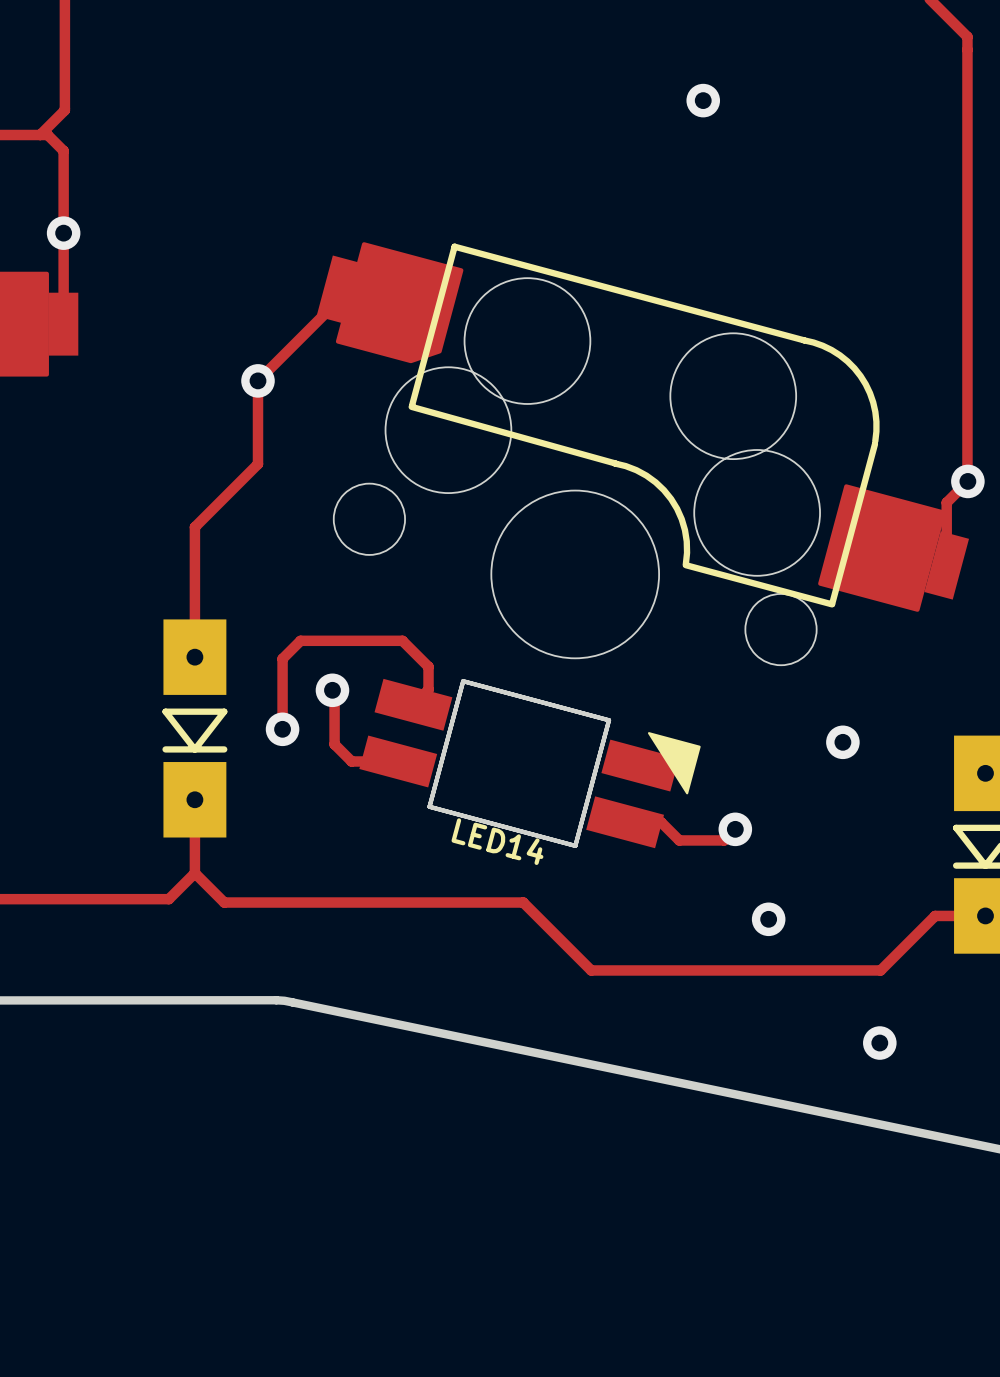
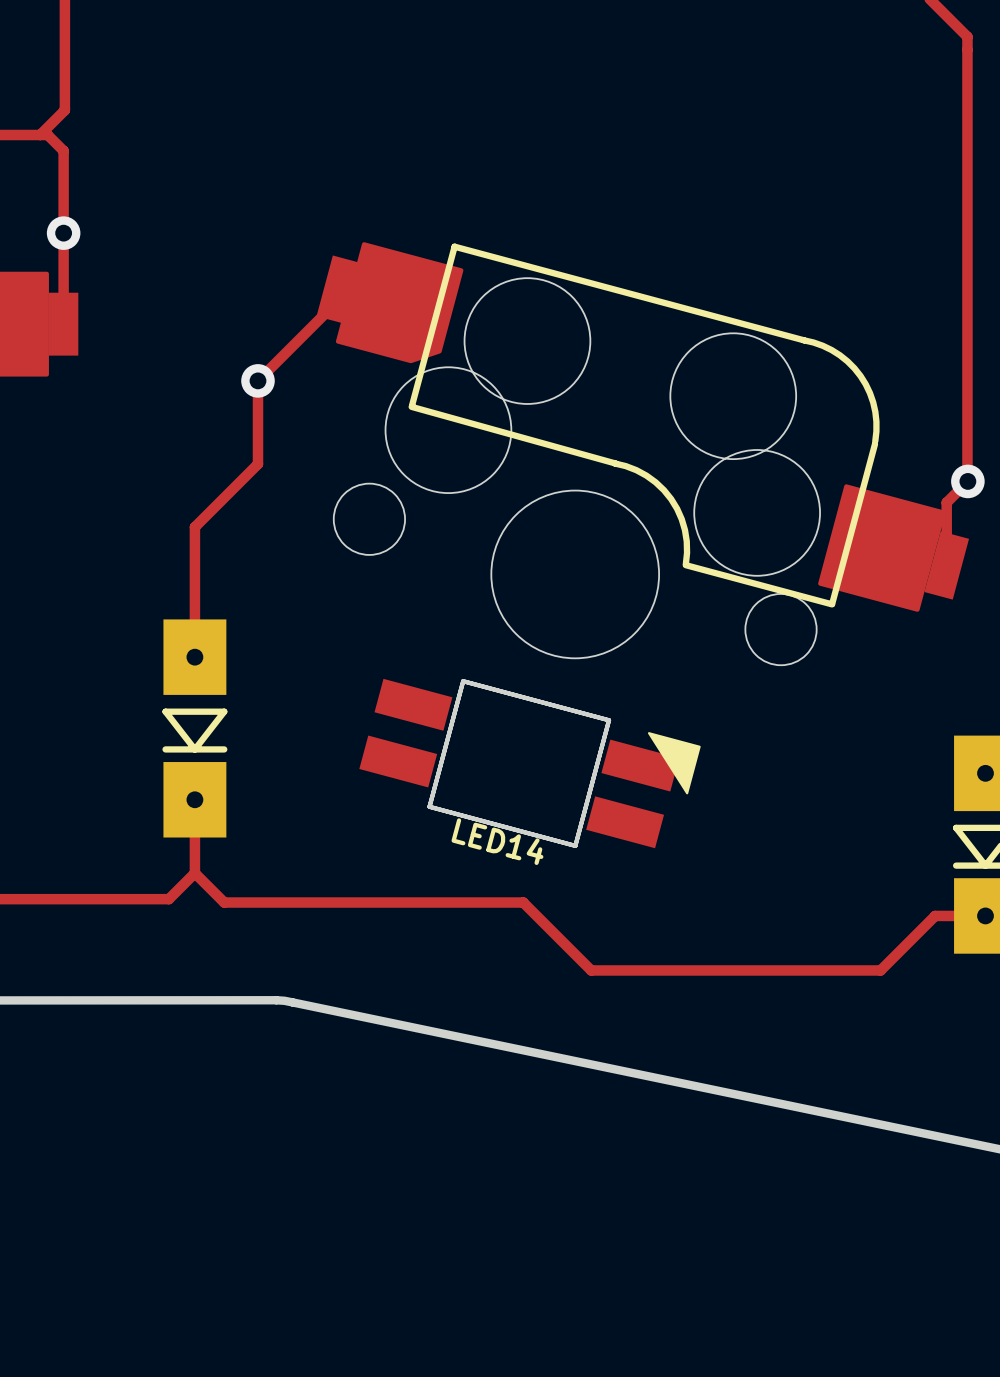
via: (703, 100) -> none
track: (332, 690) (334, 692) (334, 744) (351, 761) (398, 761) -> none
via: (332, 690) -> none
track: (413, 704) (428, 689) (428, 666) (402, 640) (300, 640) (282, 658) (282, 729) -> none
via: (282, 729) -> none
via: (842, 742) -> none
track: (625, 822) (661, 822) (679, 840) (724, 840) (735, 829) -> none
via: (735, 829) -> none
via: (768, 919) -> none
via: (879, 1043) -> none

